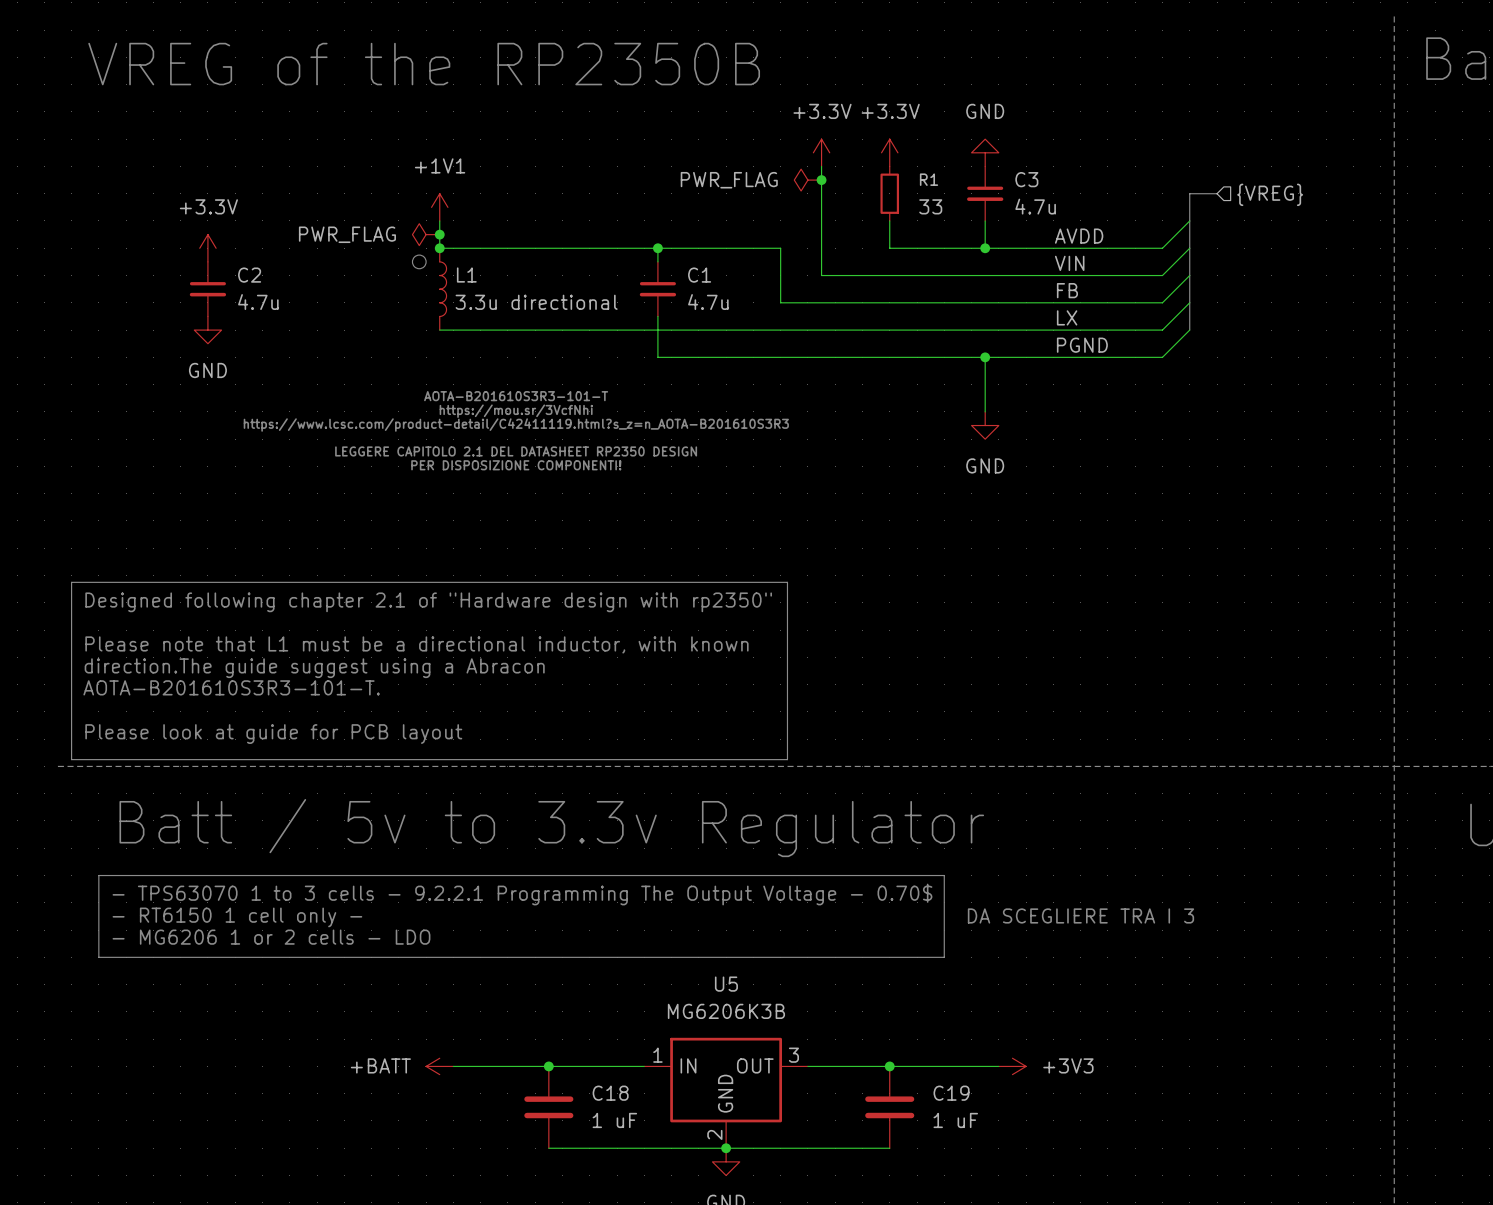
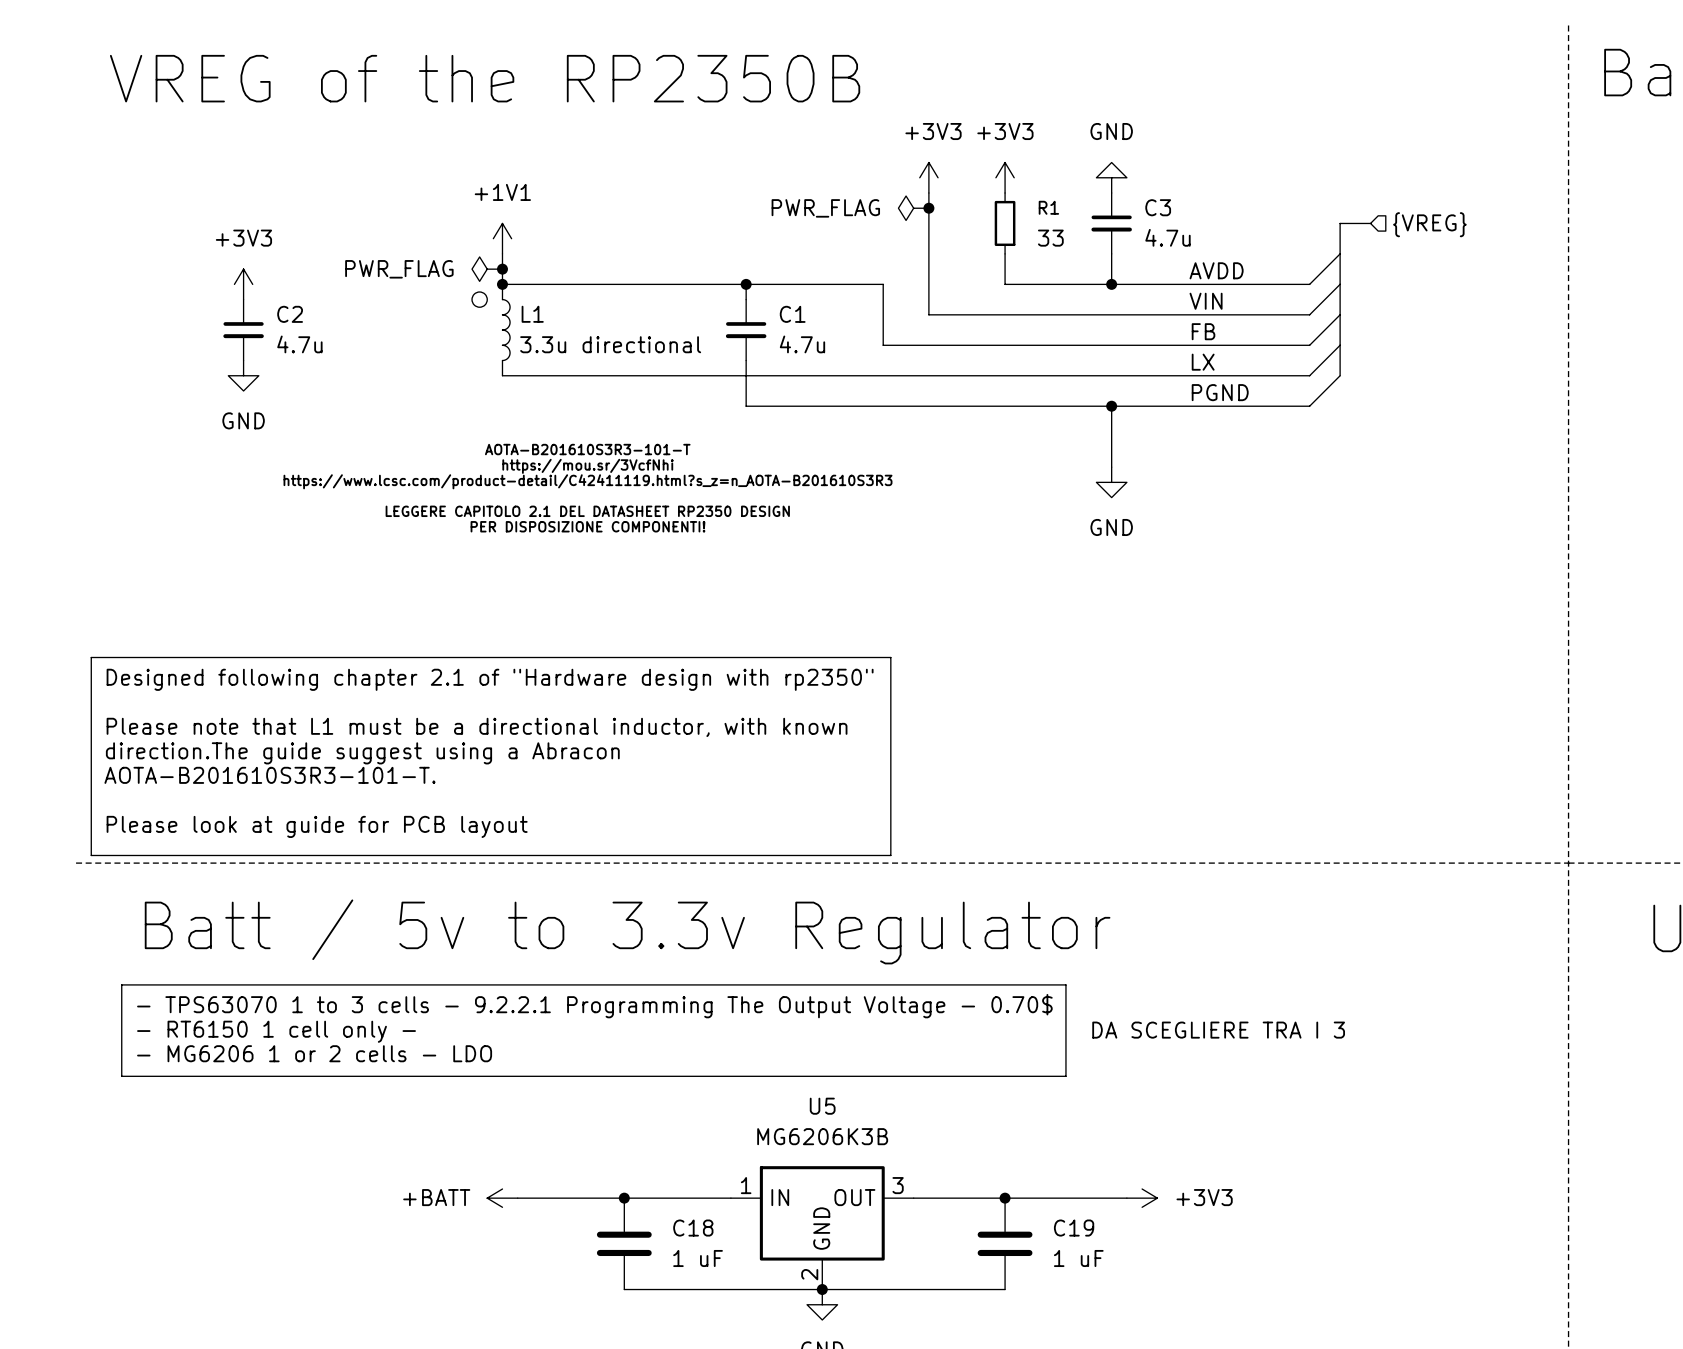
power symbol: +3.3V (821, 152) -> +3V3 (928, 177)
power symbol: +3.3V (889, 152) -> +3V3 (1005, 177)
power symbol: +3.3V (207, 248) -> +3V3 (243, 284)

